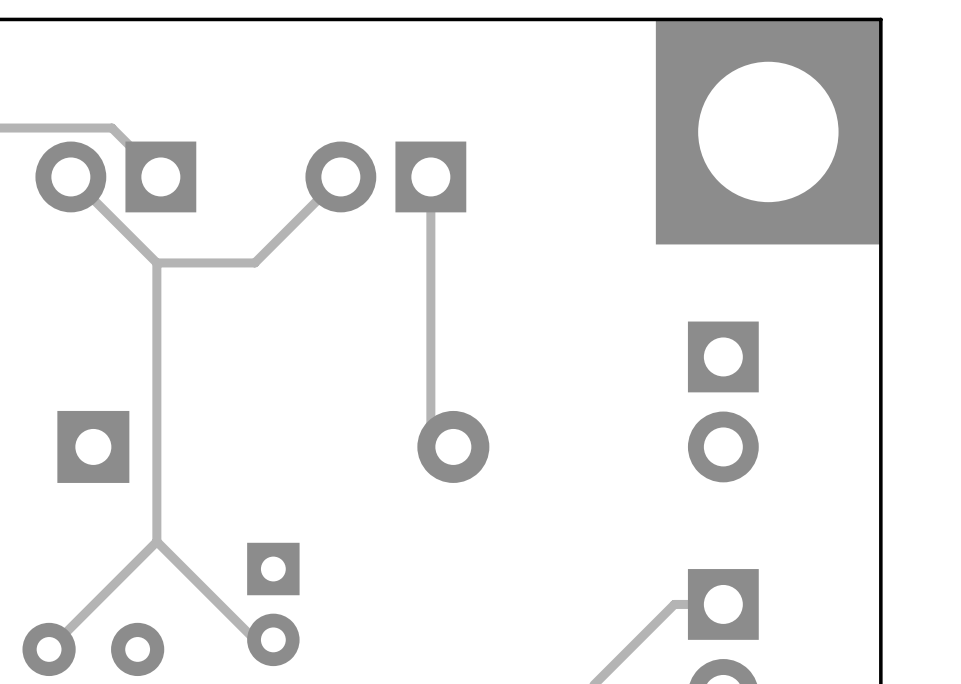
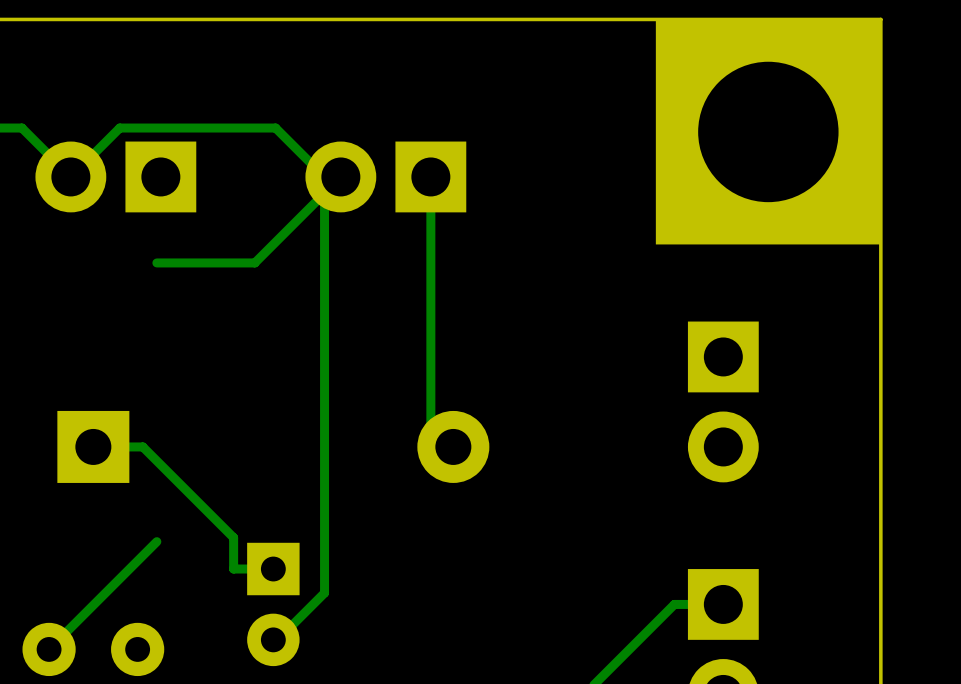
track: (21, 128) (111, 128) (160, 176) -> none
track: (70, 176) (156, 262) (156, 541) (255, 639) (273, 639) -> (21, 128) (70, 176) (119, 128) (275, 128) (324, 176) (324, 592) (277, 639) (273, 639)
track: none -> (93, 446) (142, 446) (233, 537) (233, 569) (273, 569)

